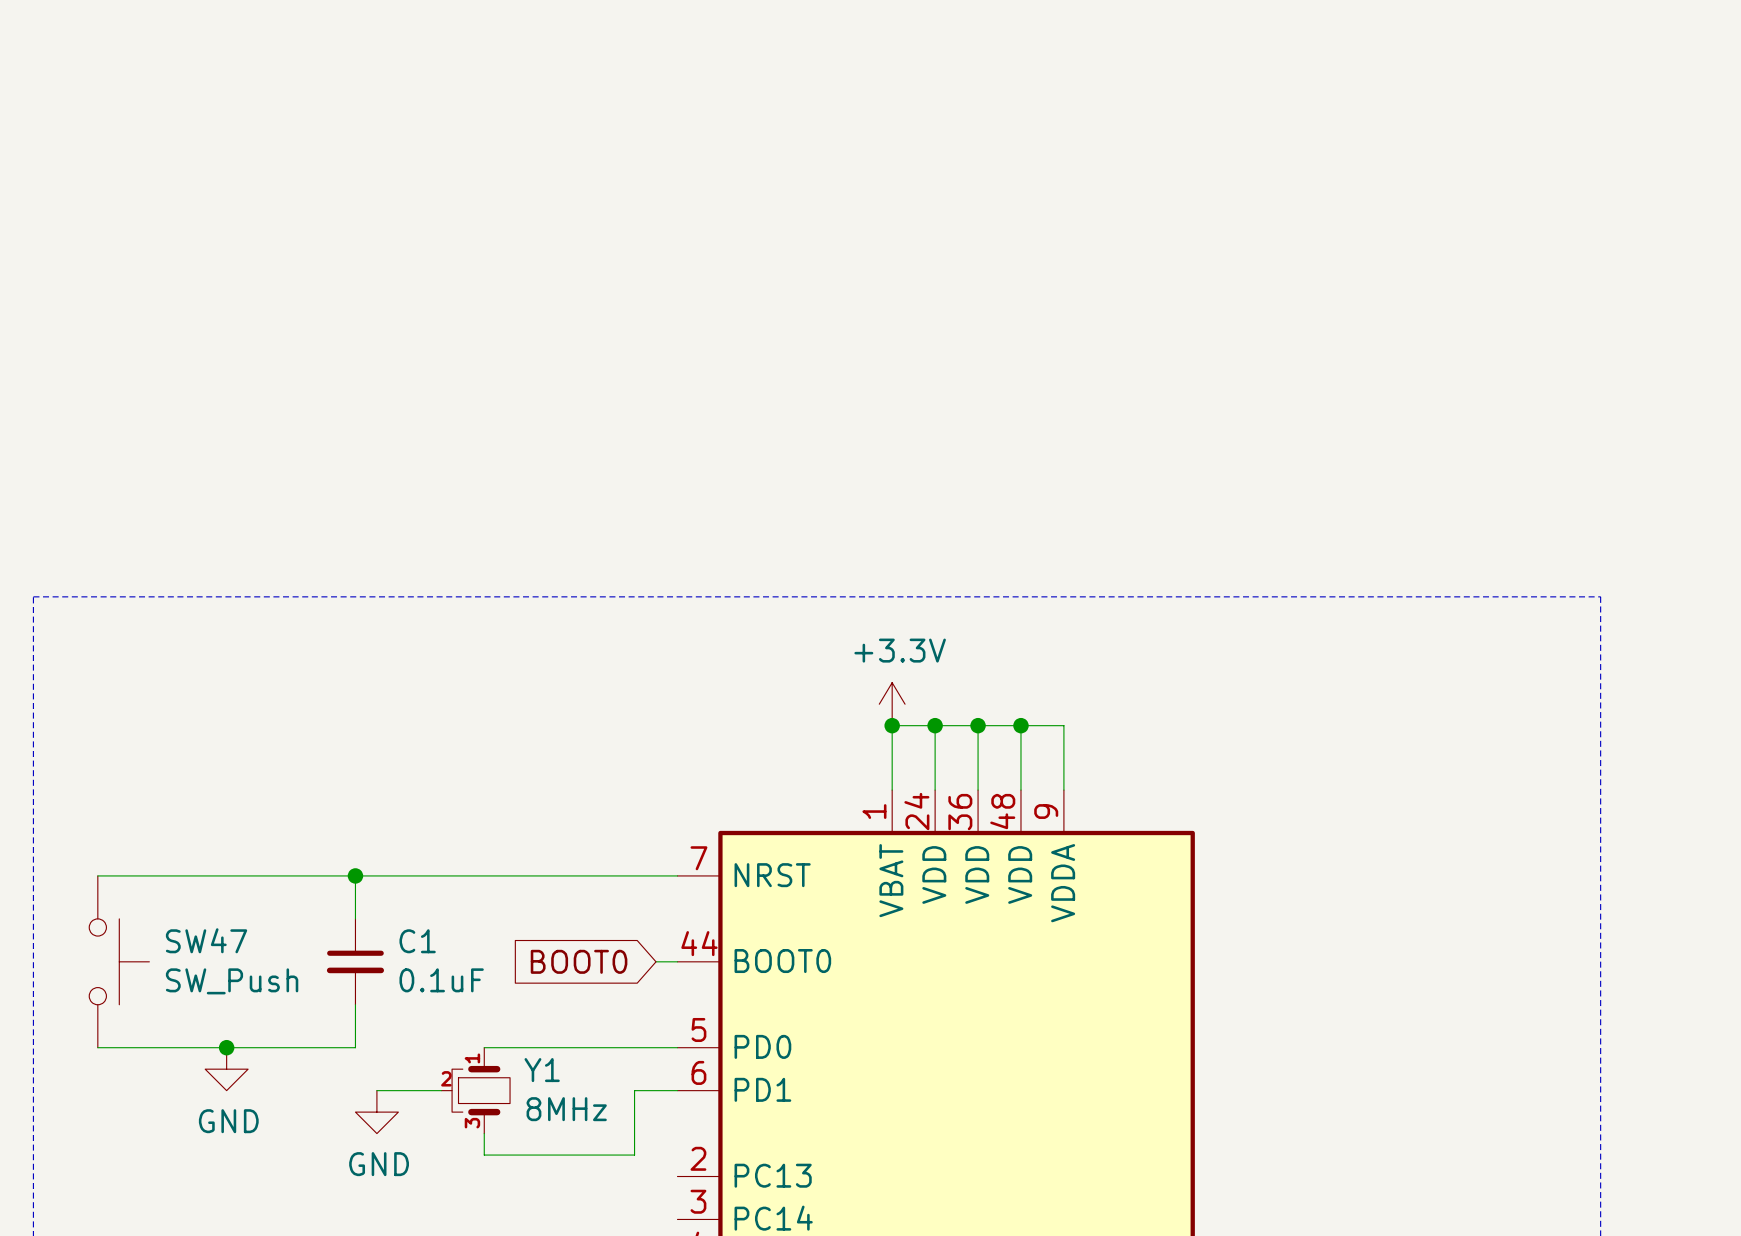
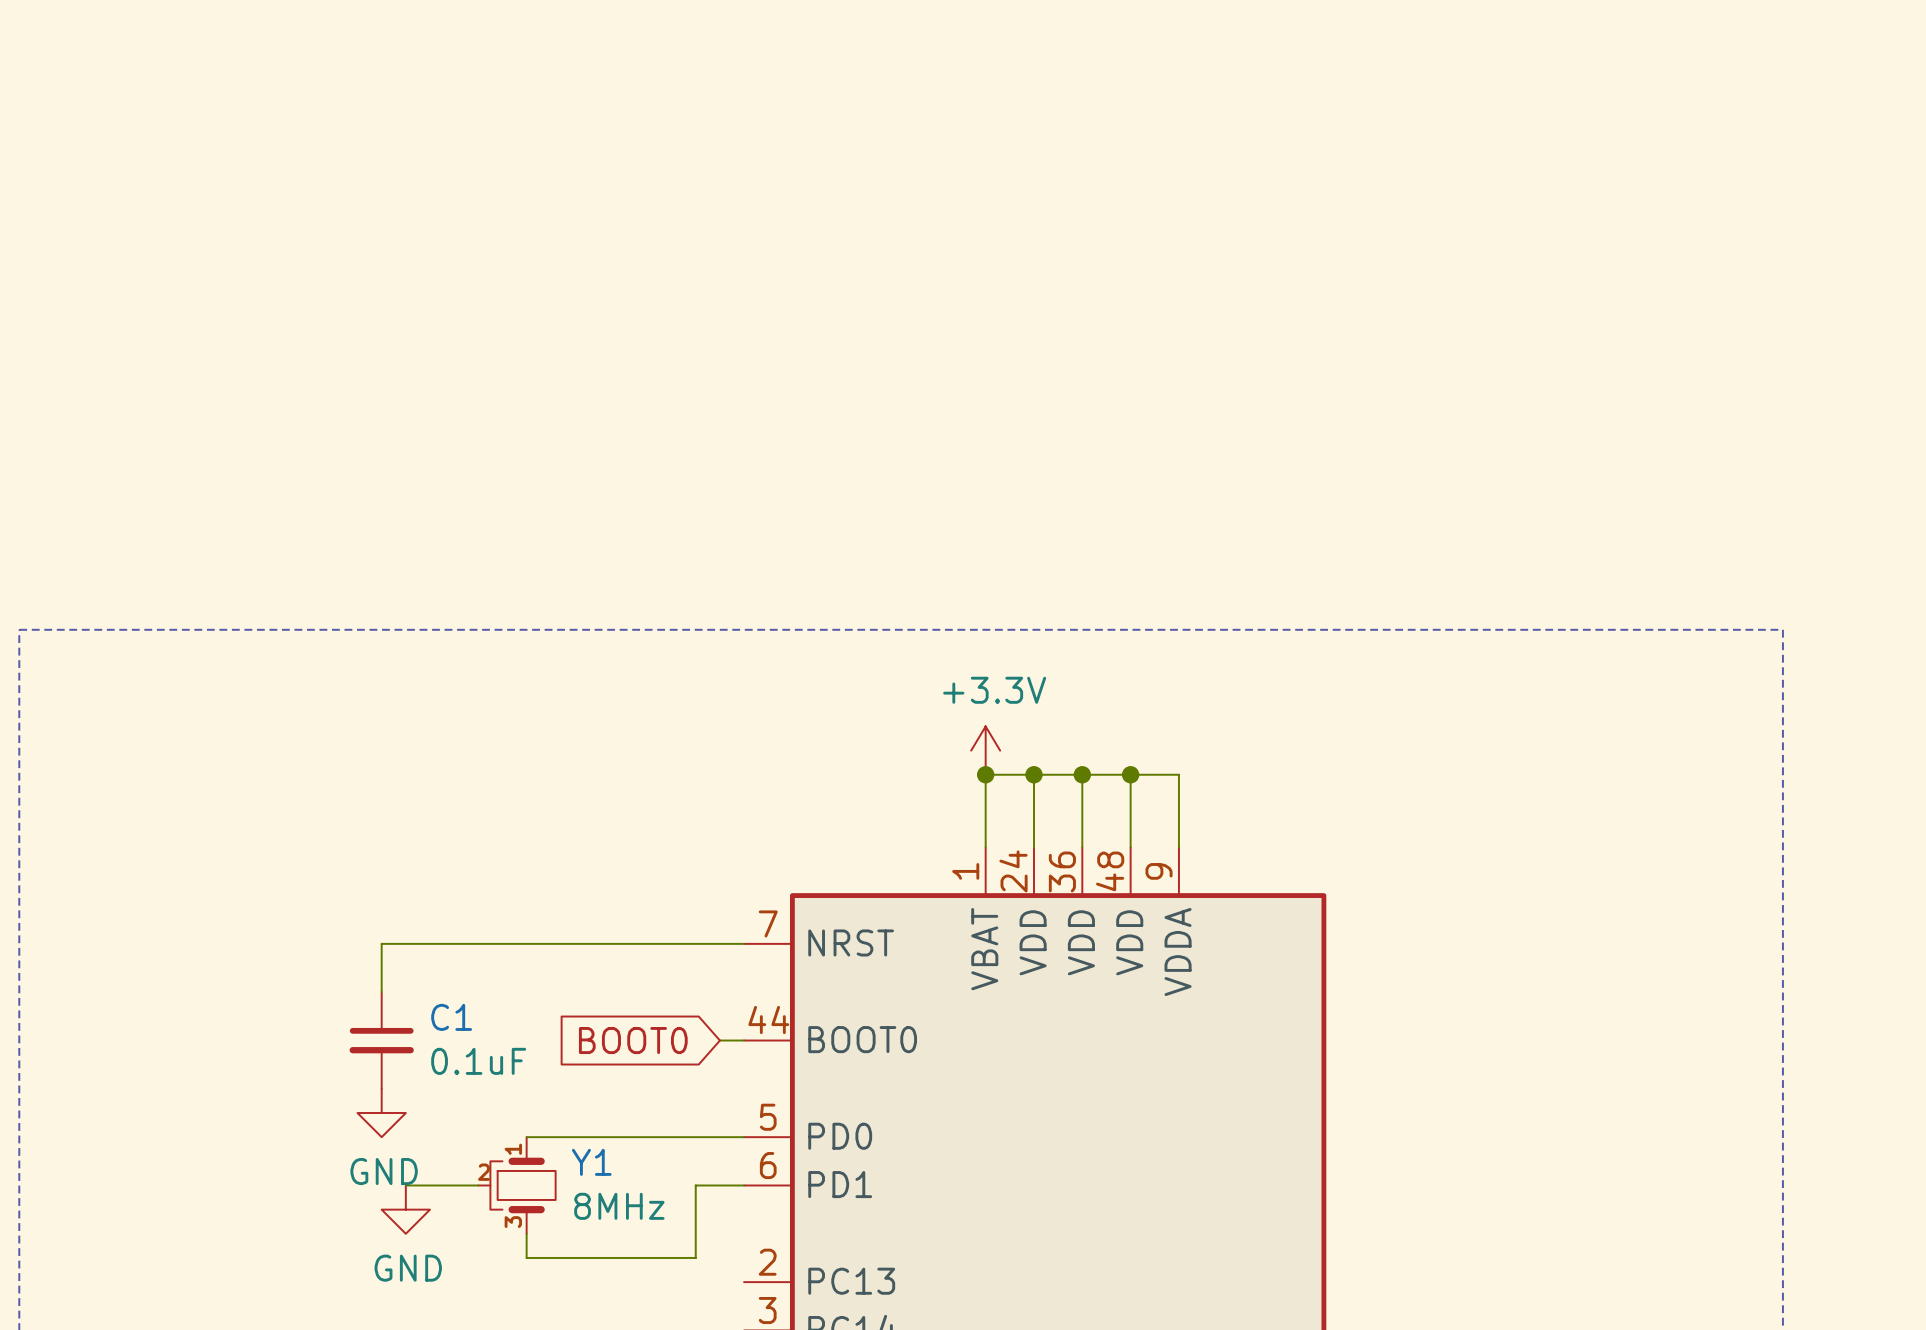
wire: (97, 875) (355, 875) -> none
junction: (355, 875) -> none
SW47: SW_Push (119, 961) -> none
wire: (355, 1004) (355, 1047) (97, 1047) -> none
junction: (226, 1047) -> none
power symbol position: GND (226, 1069) -> GND (381, 1113)

